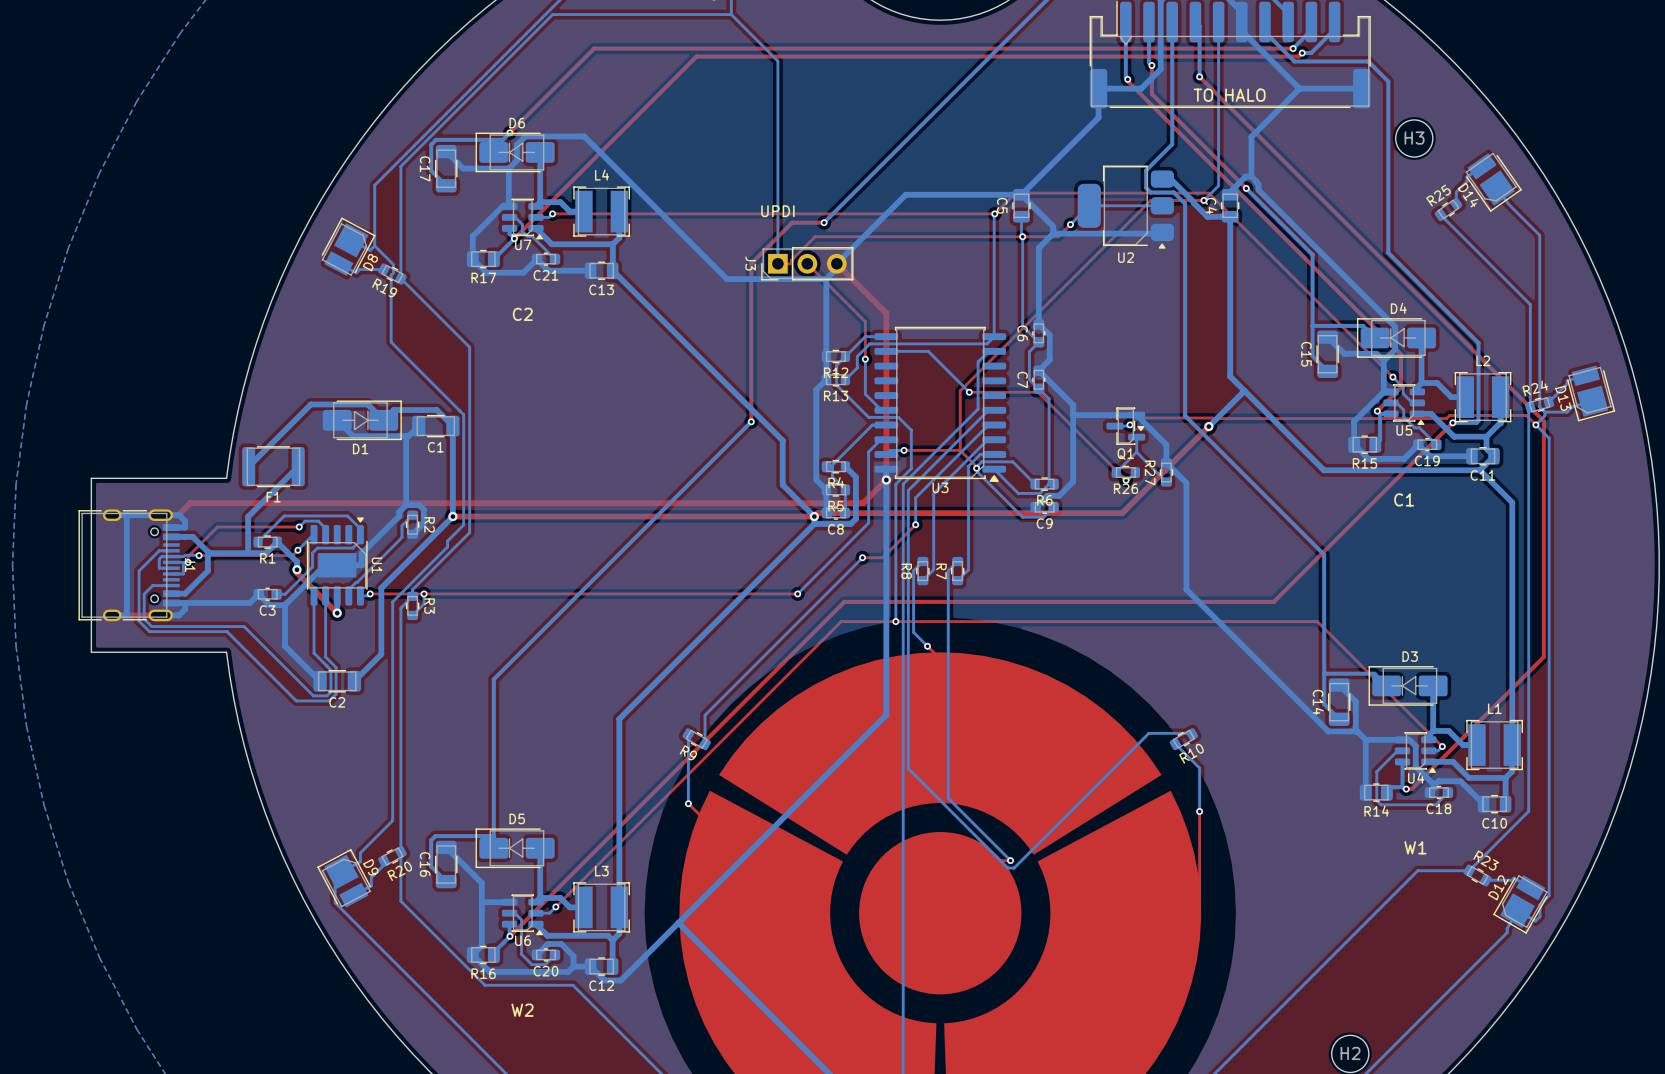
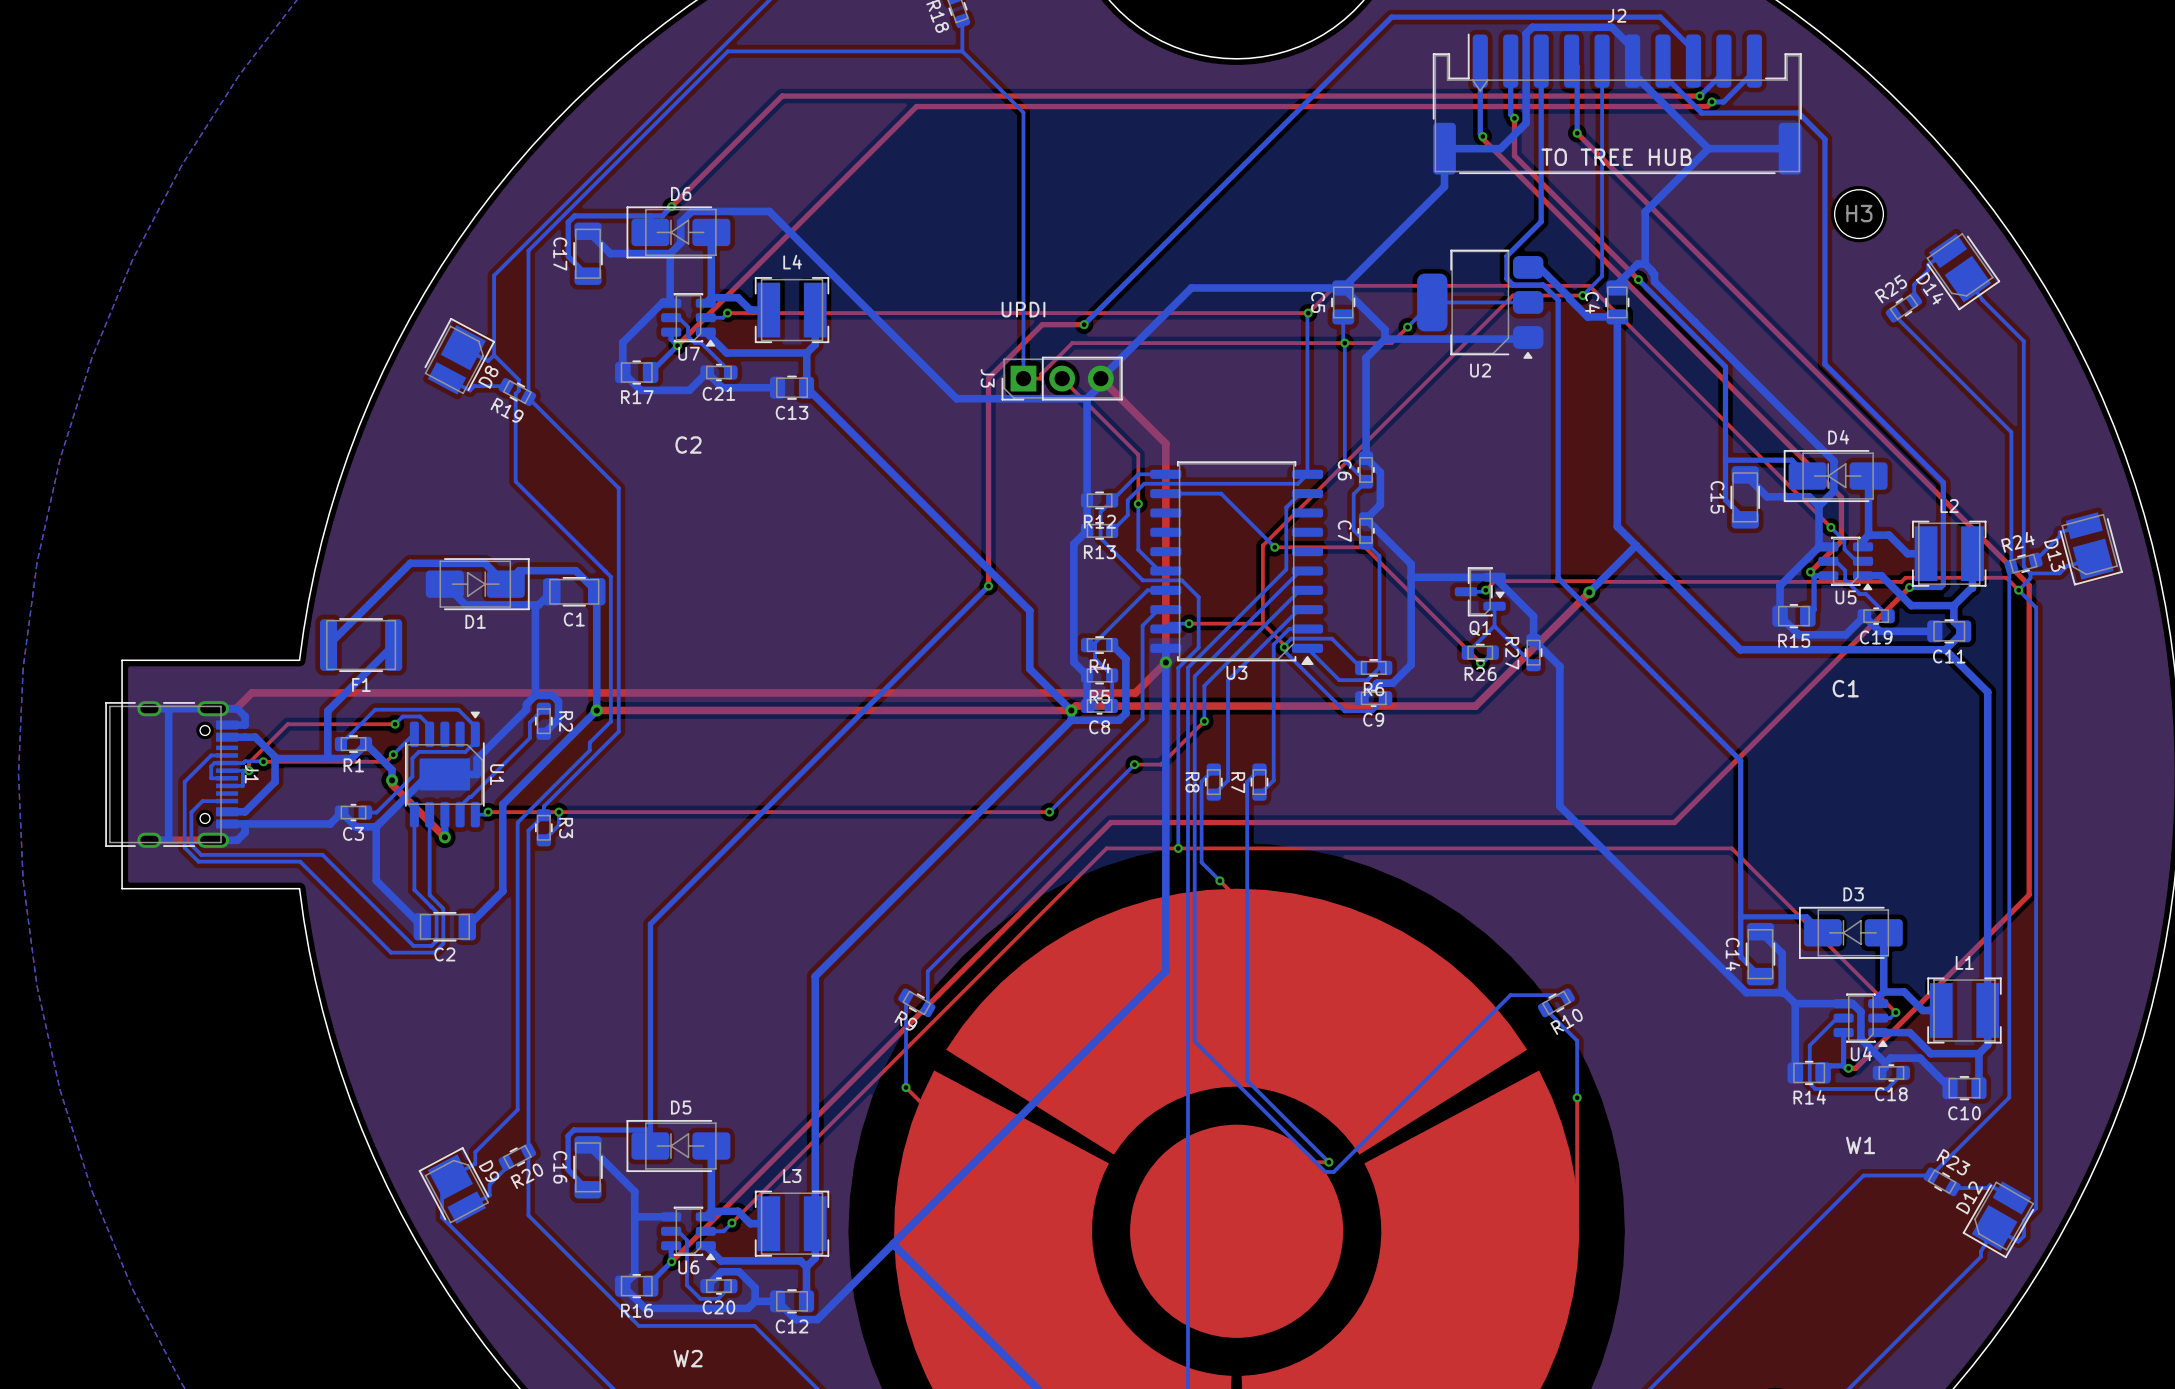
text: TO HALO (1229, 95) -> TO TREE HUB (1616, 157)

